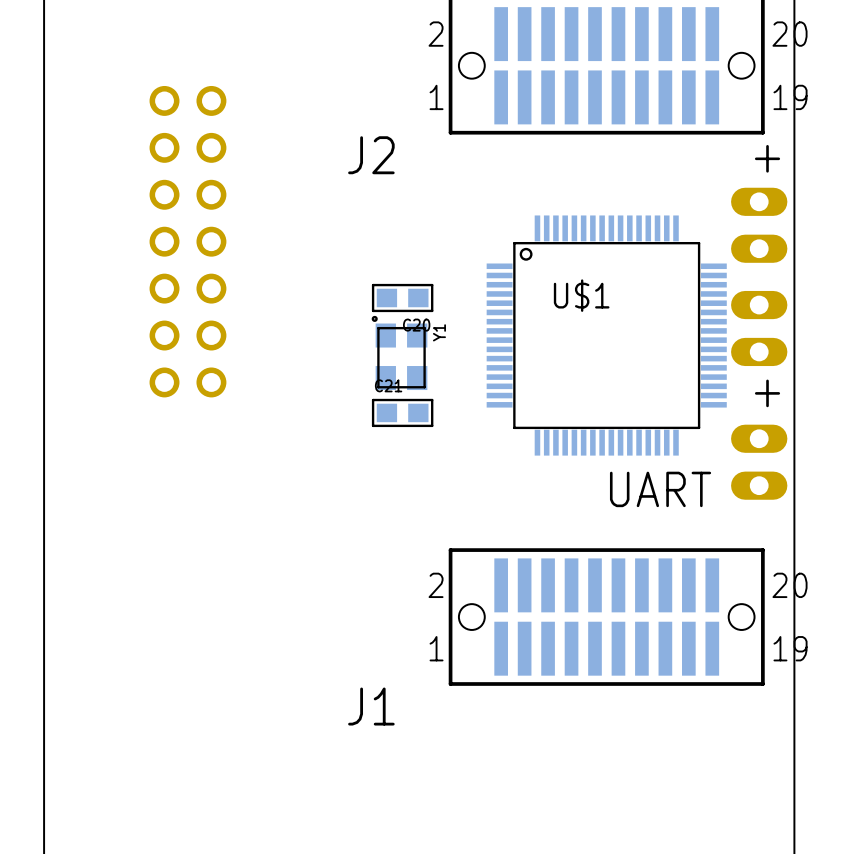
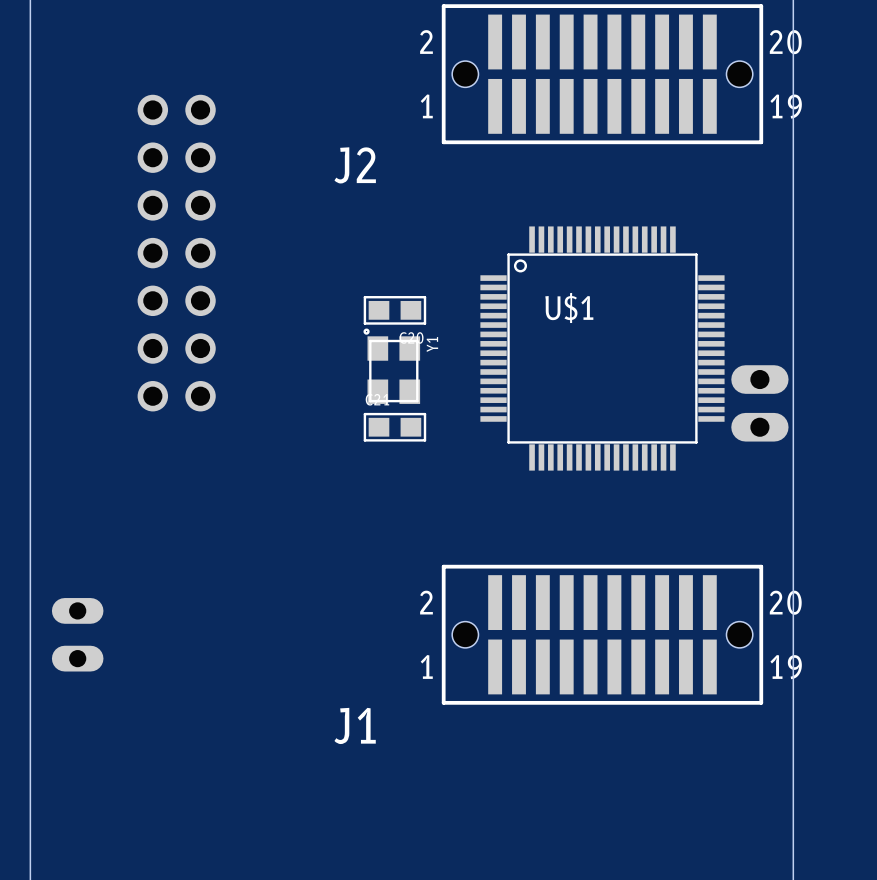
text: + (767, 158) -> none
part: (759, 225) -> none
part: (759, 328) -> none
part: none -> (759, 403)
text: + (767, 393) -> none
part: (759, 462) -> none
text: UART (660, 489) -> none
part: none -> (77, 634)

